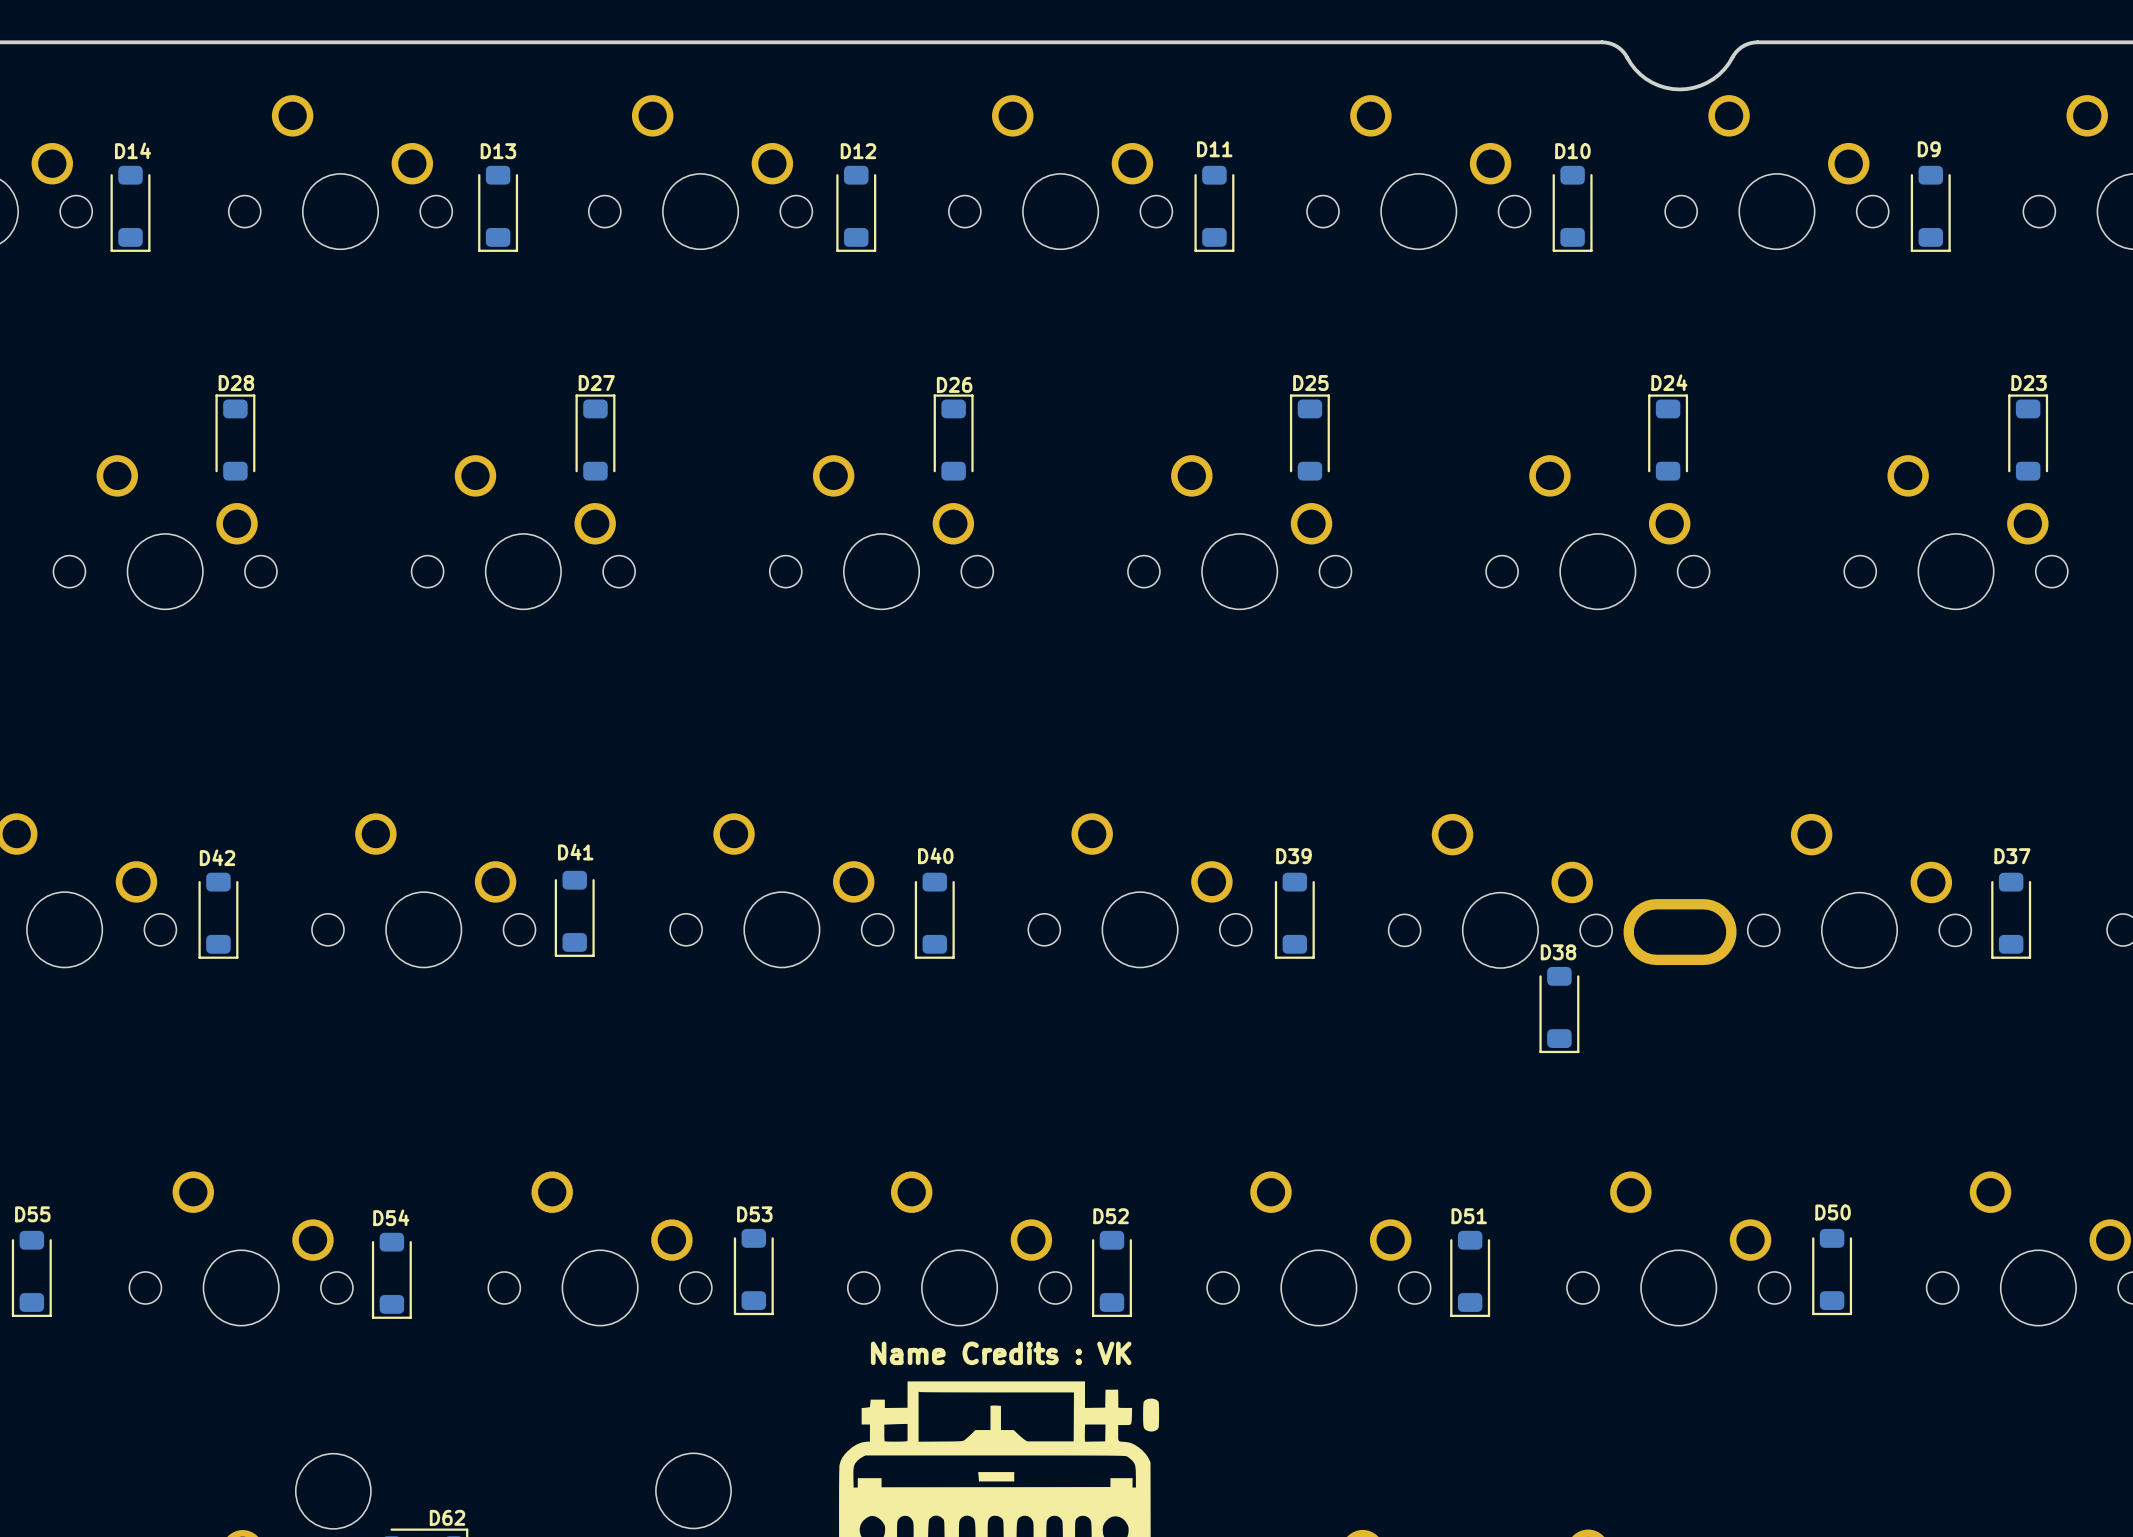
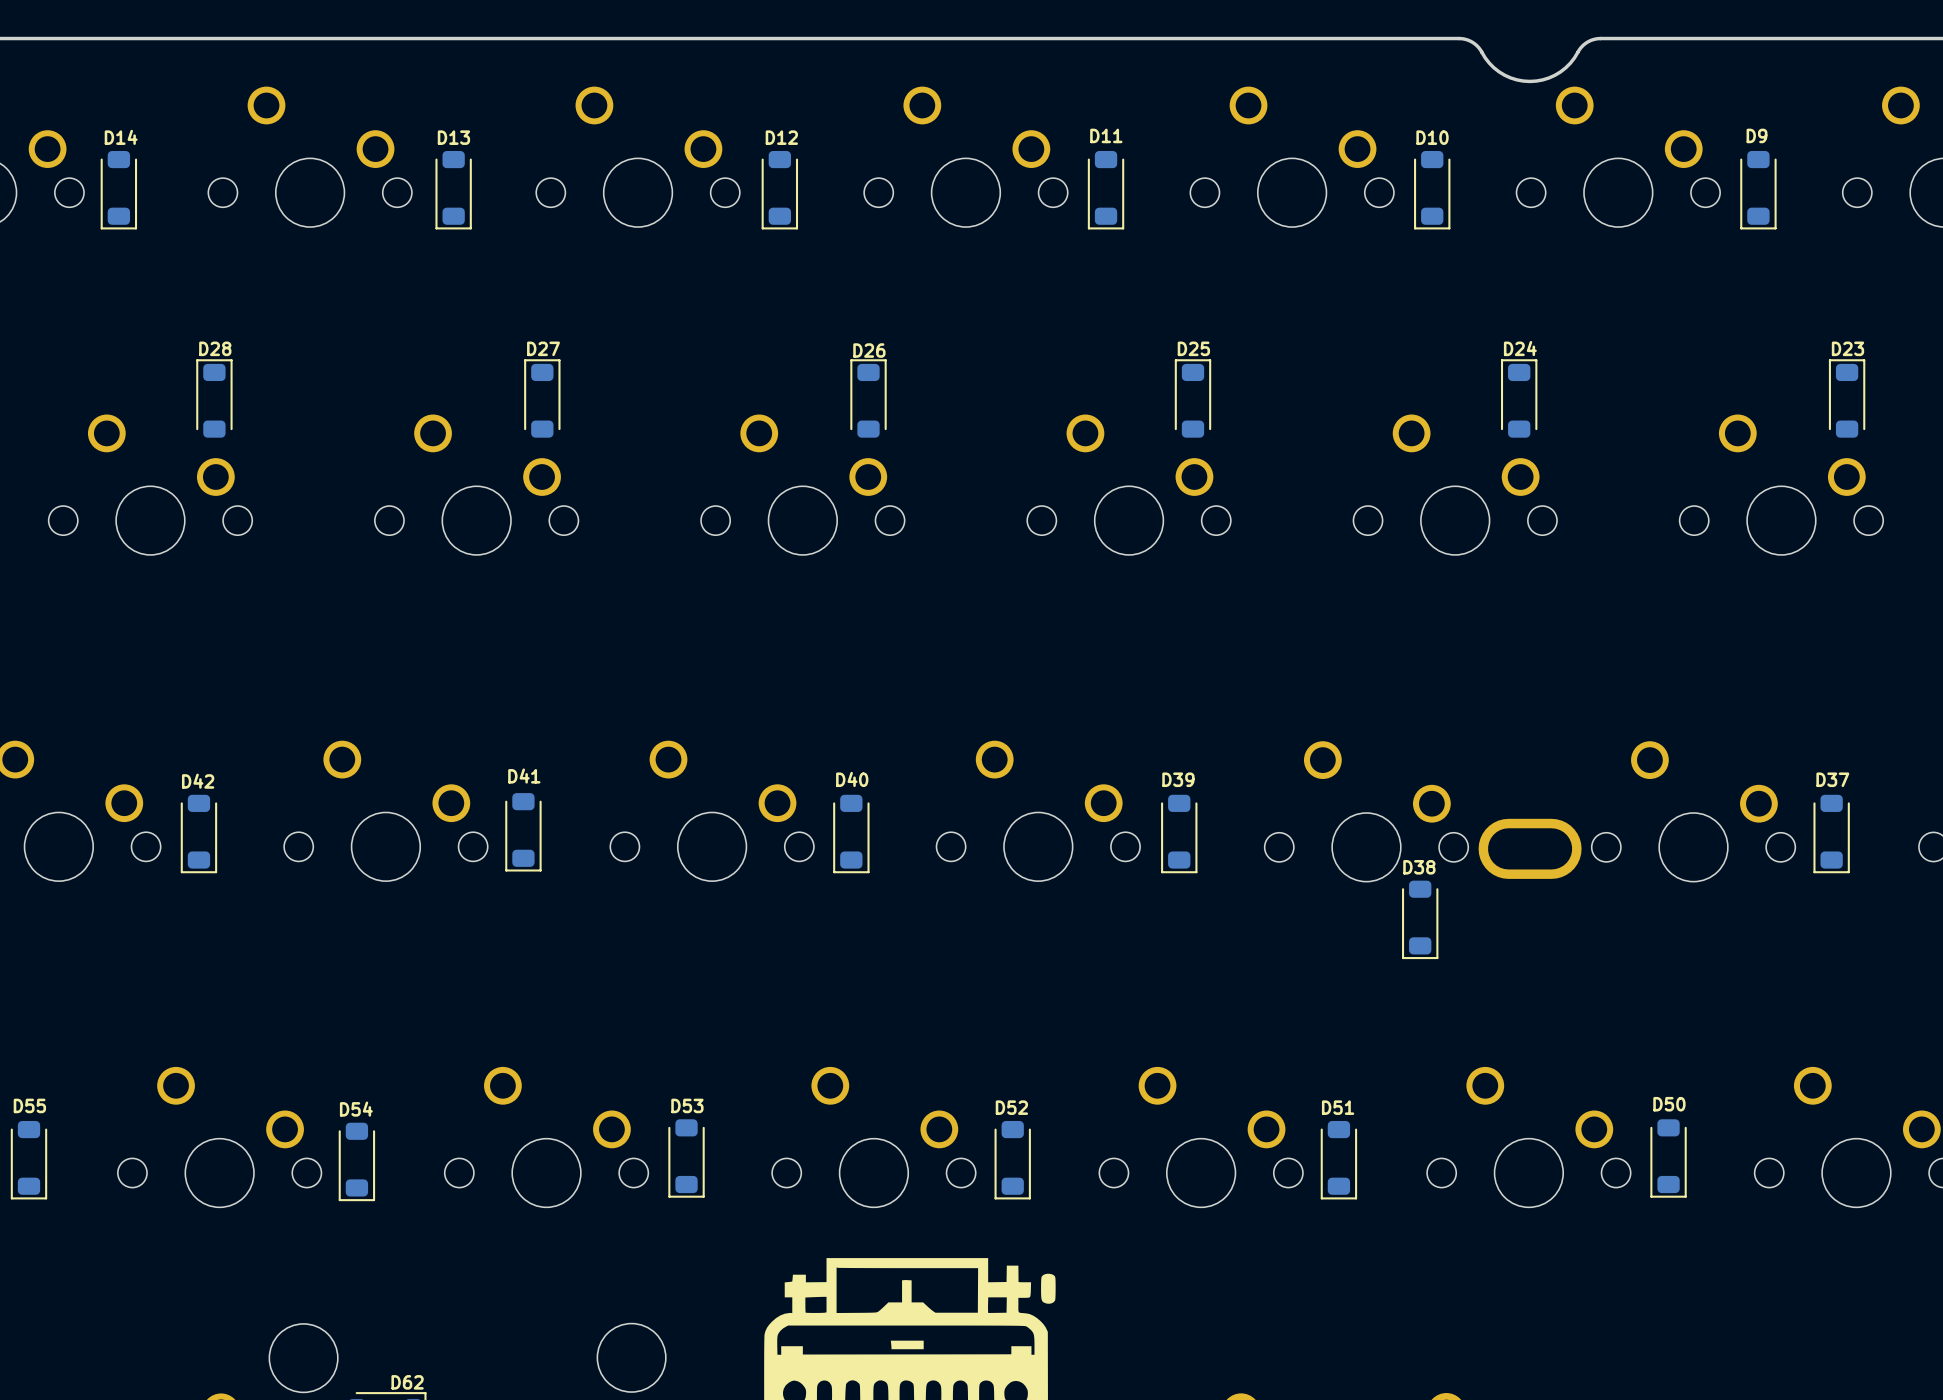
text: Name Credits : VK (1001, 1353) -> none

